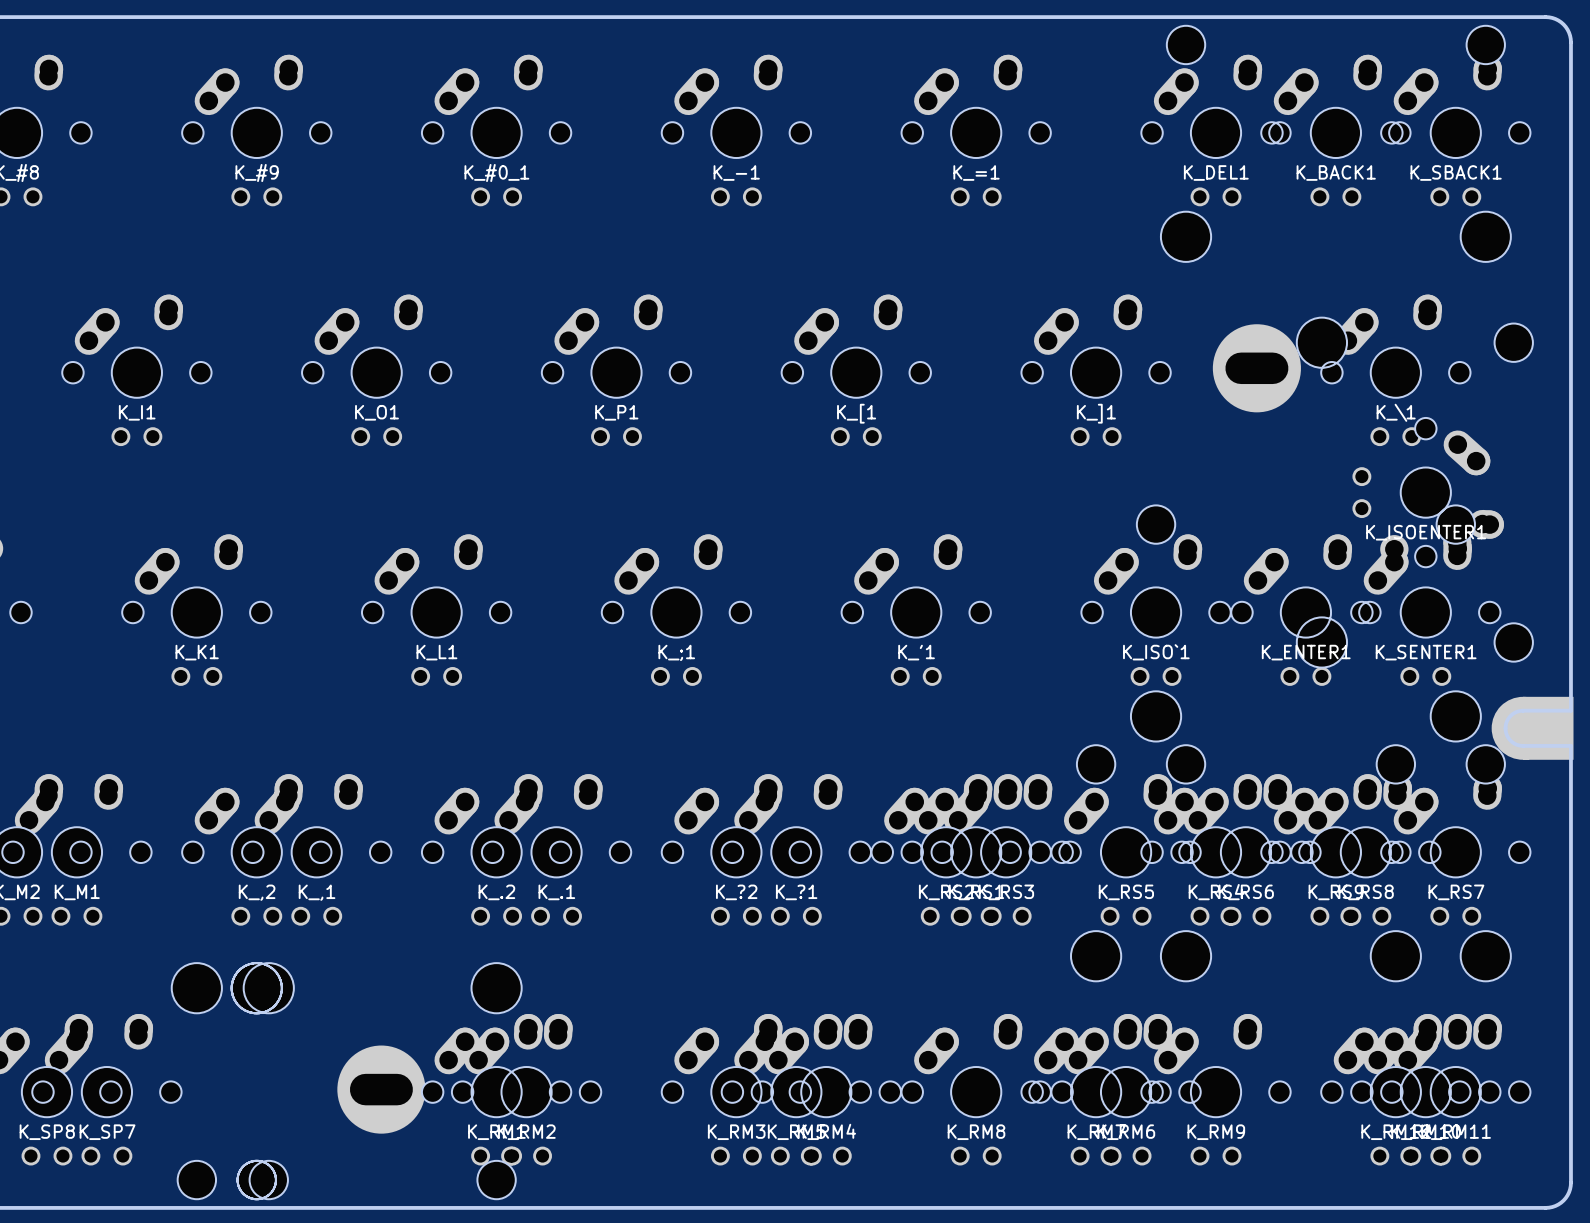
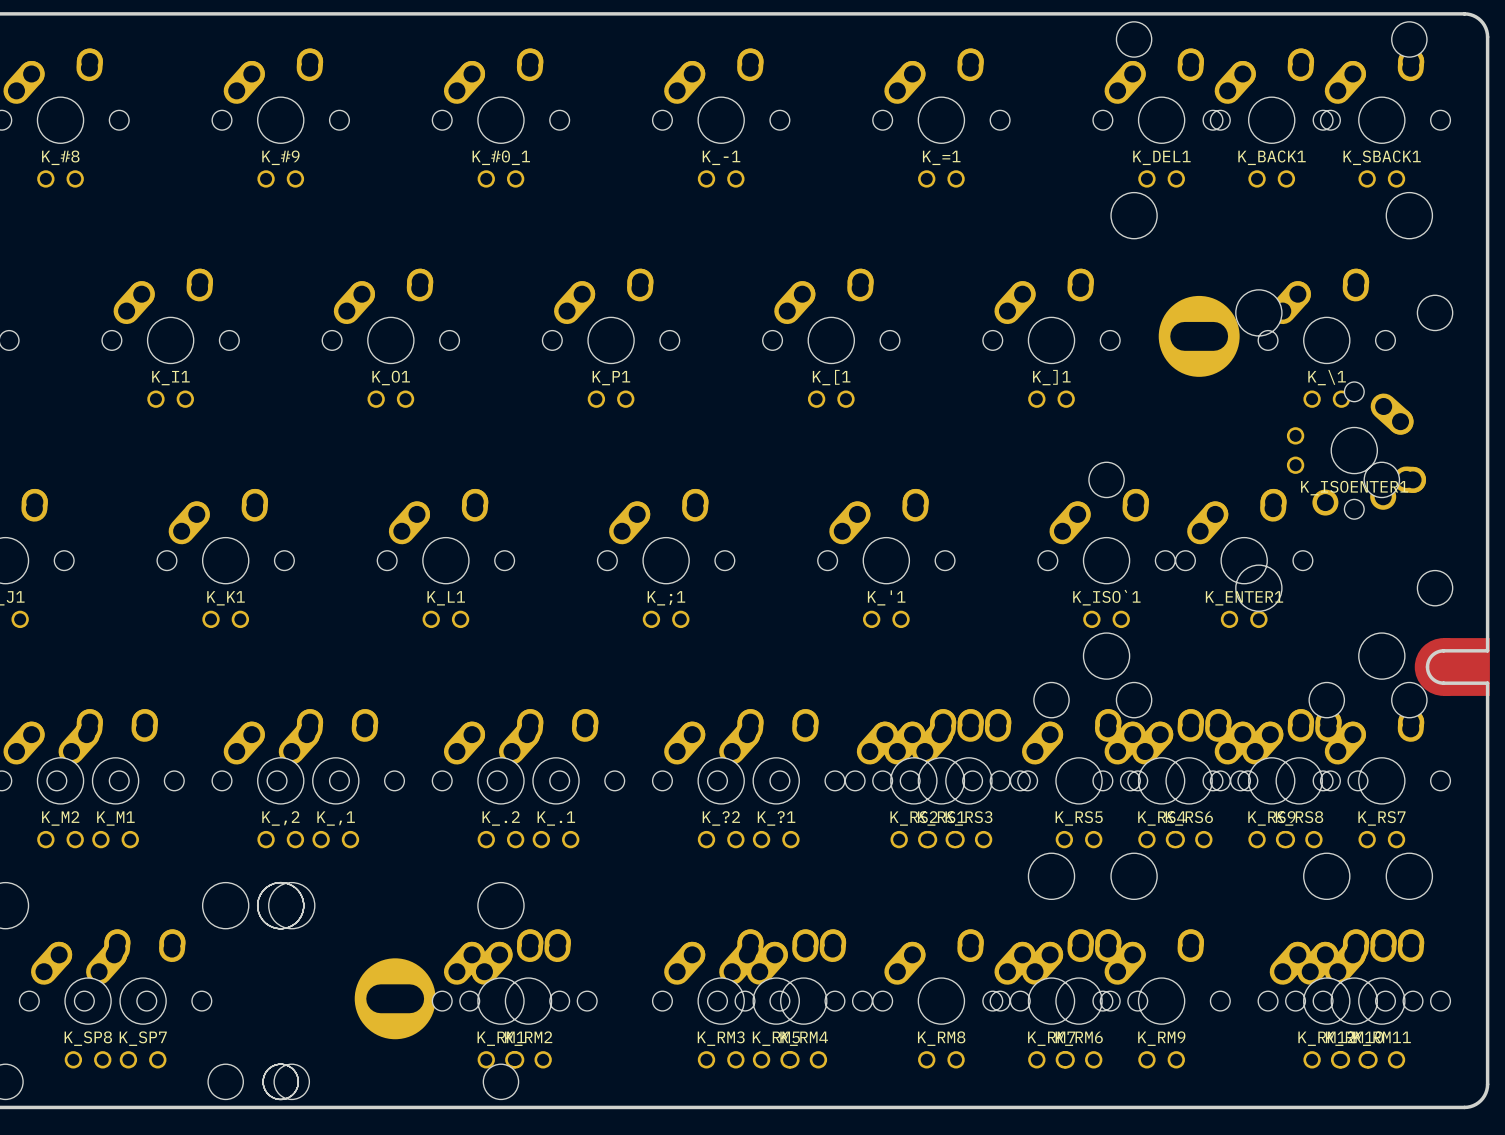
K_SENTER1: (1425, 610) -> none

